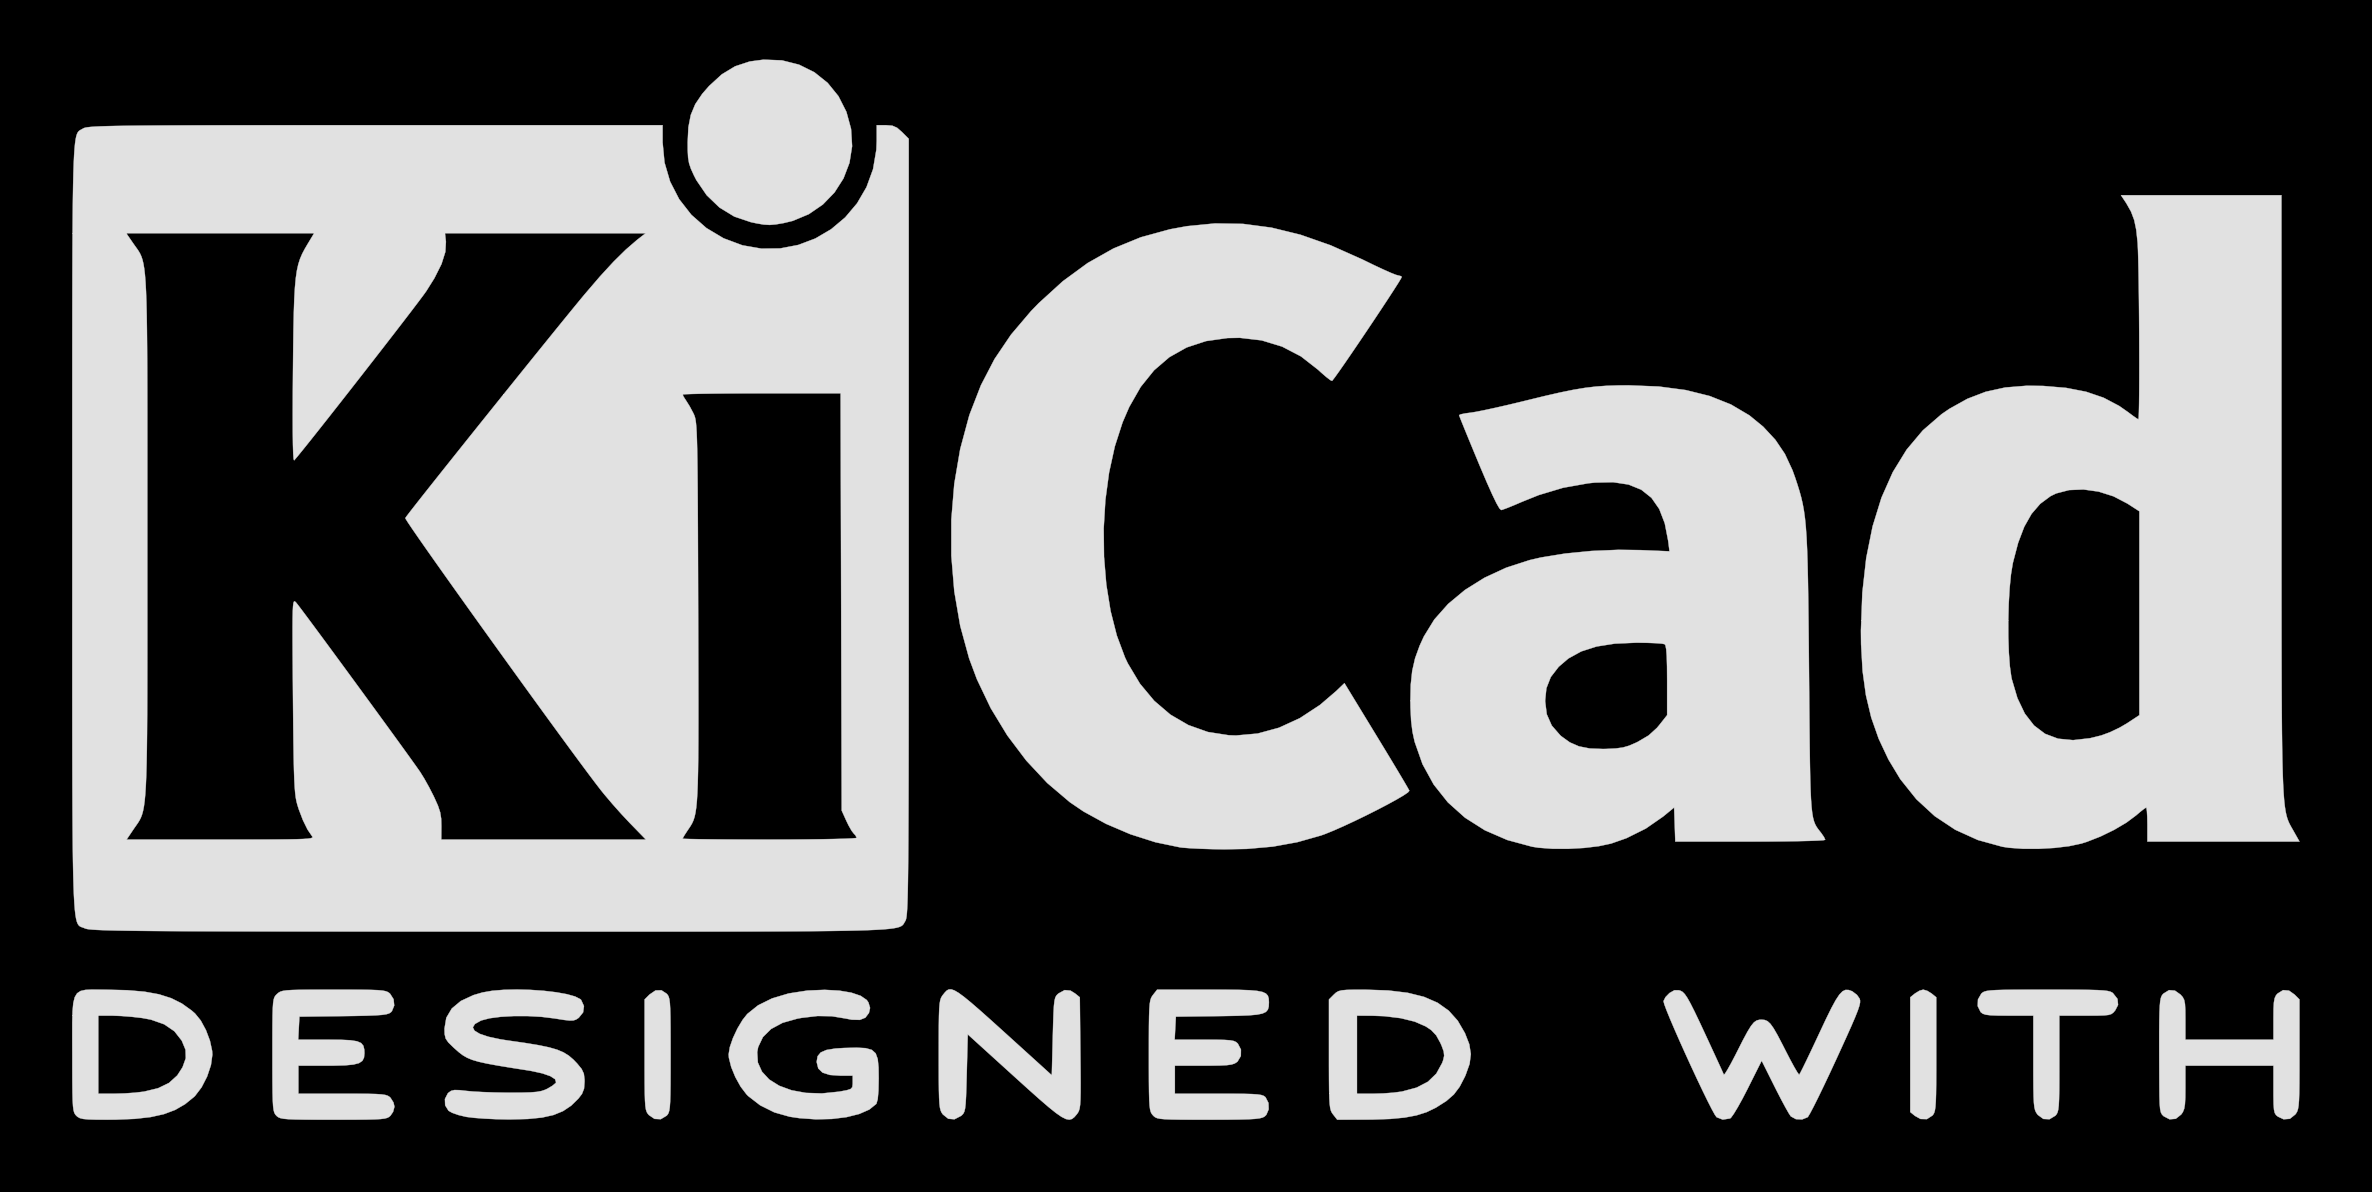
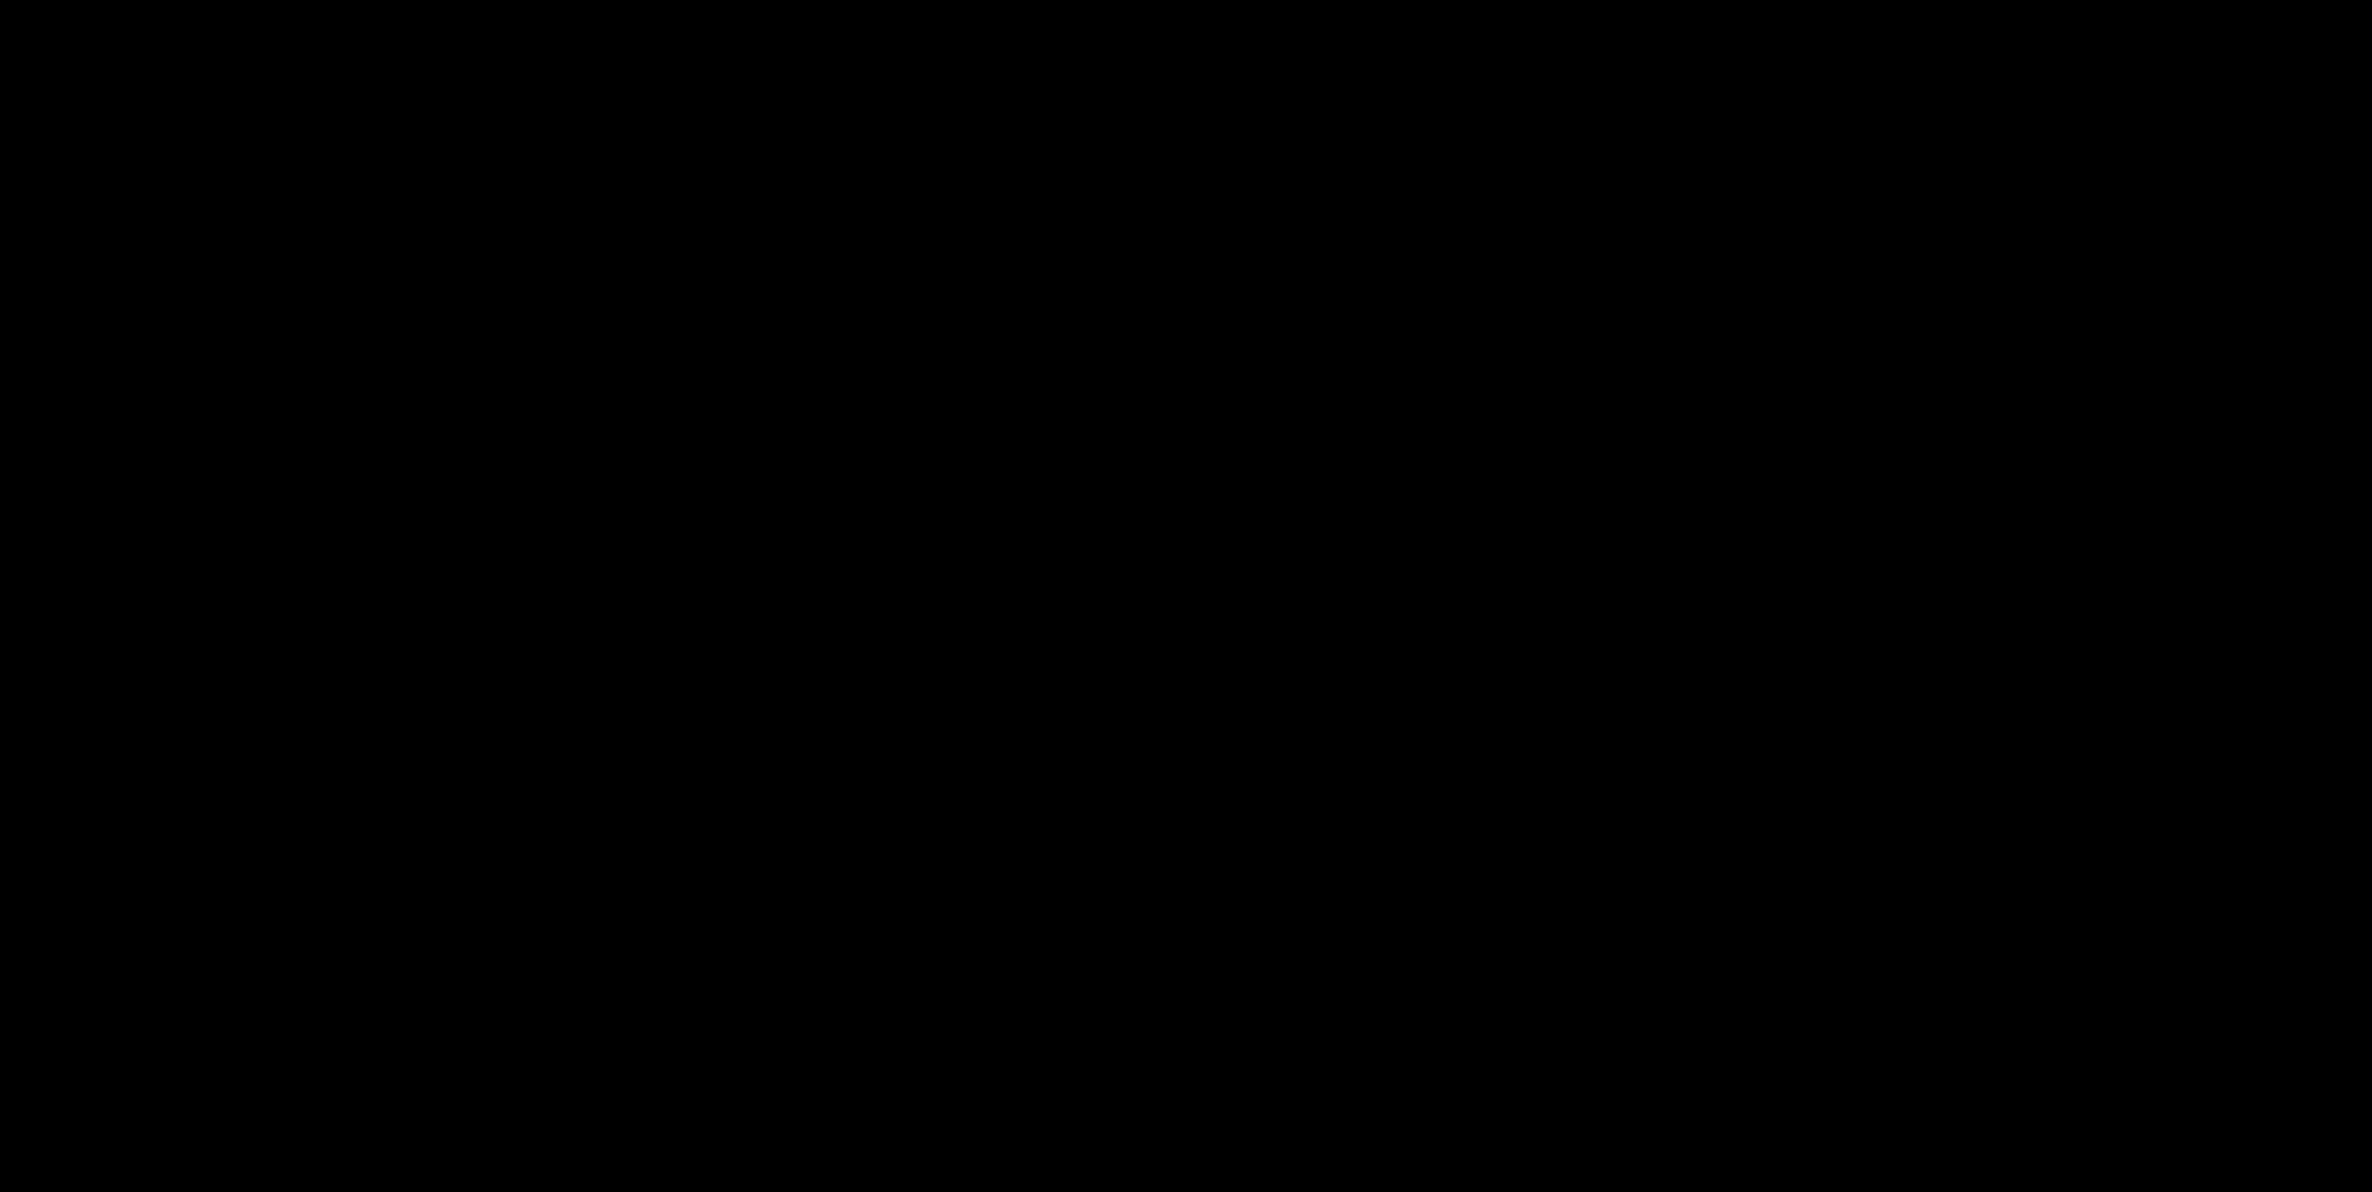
drawing: [72, 59, 2300, 1120] -> none

